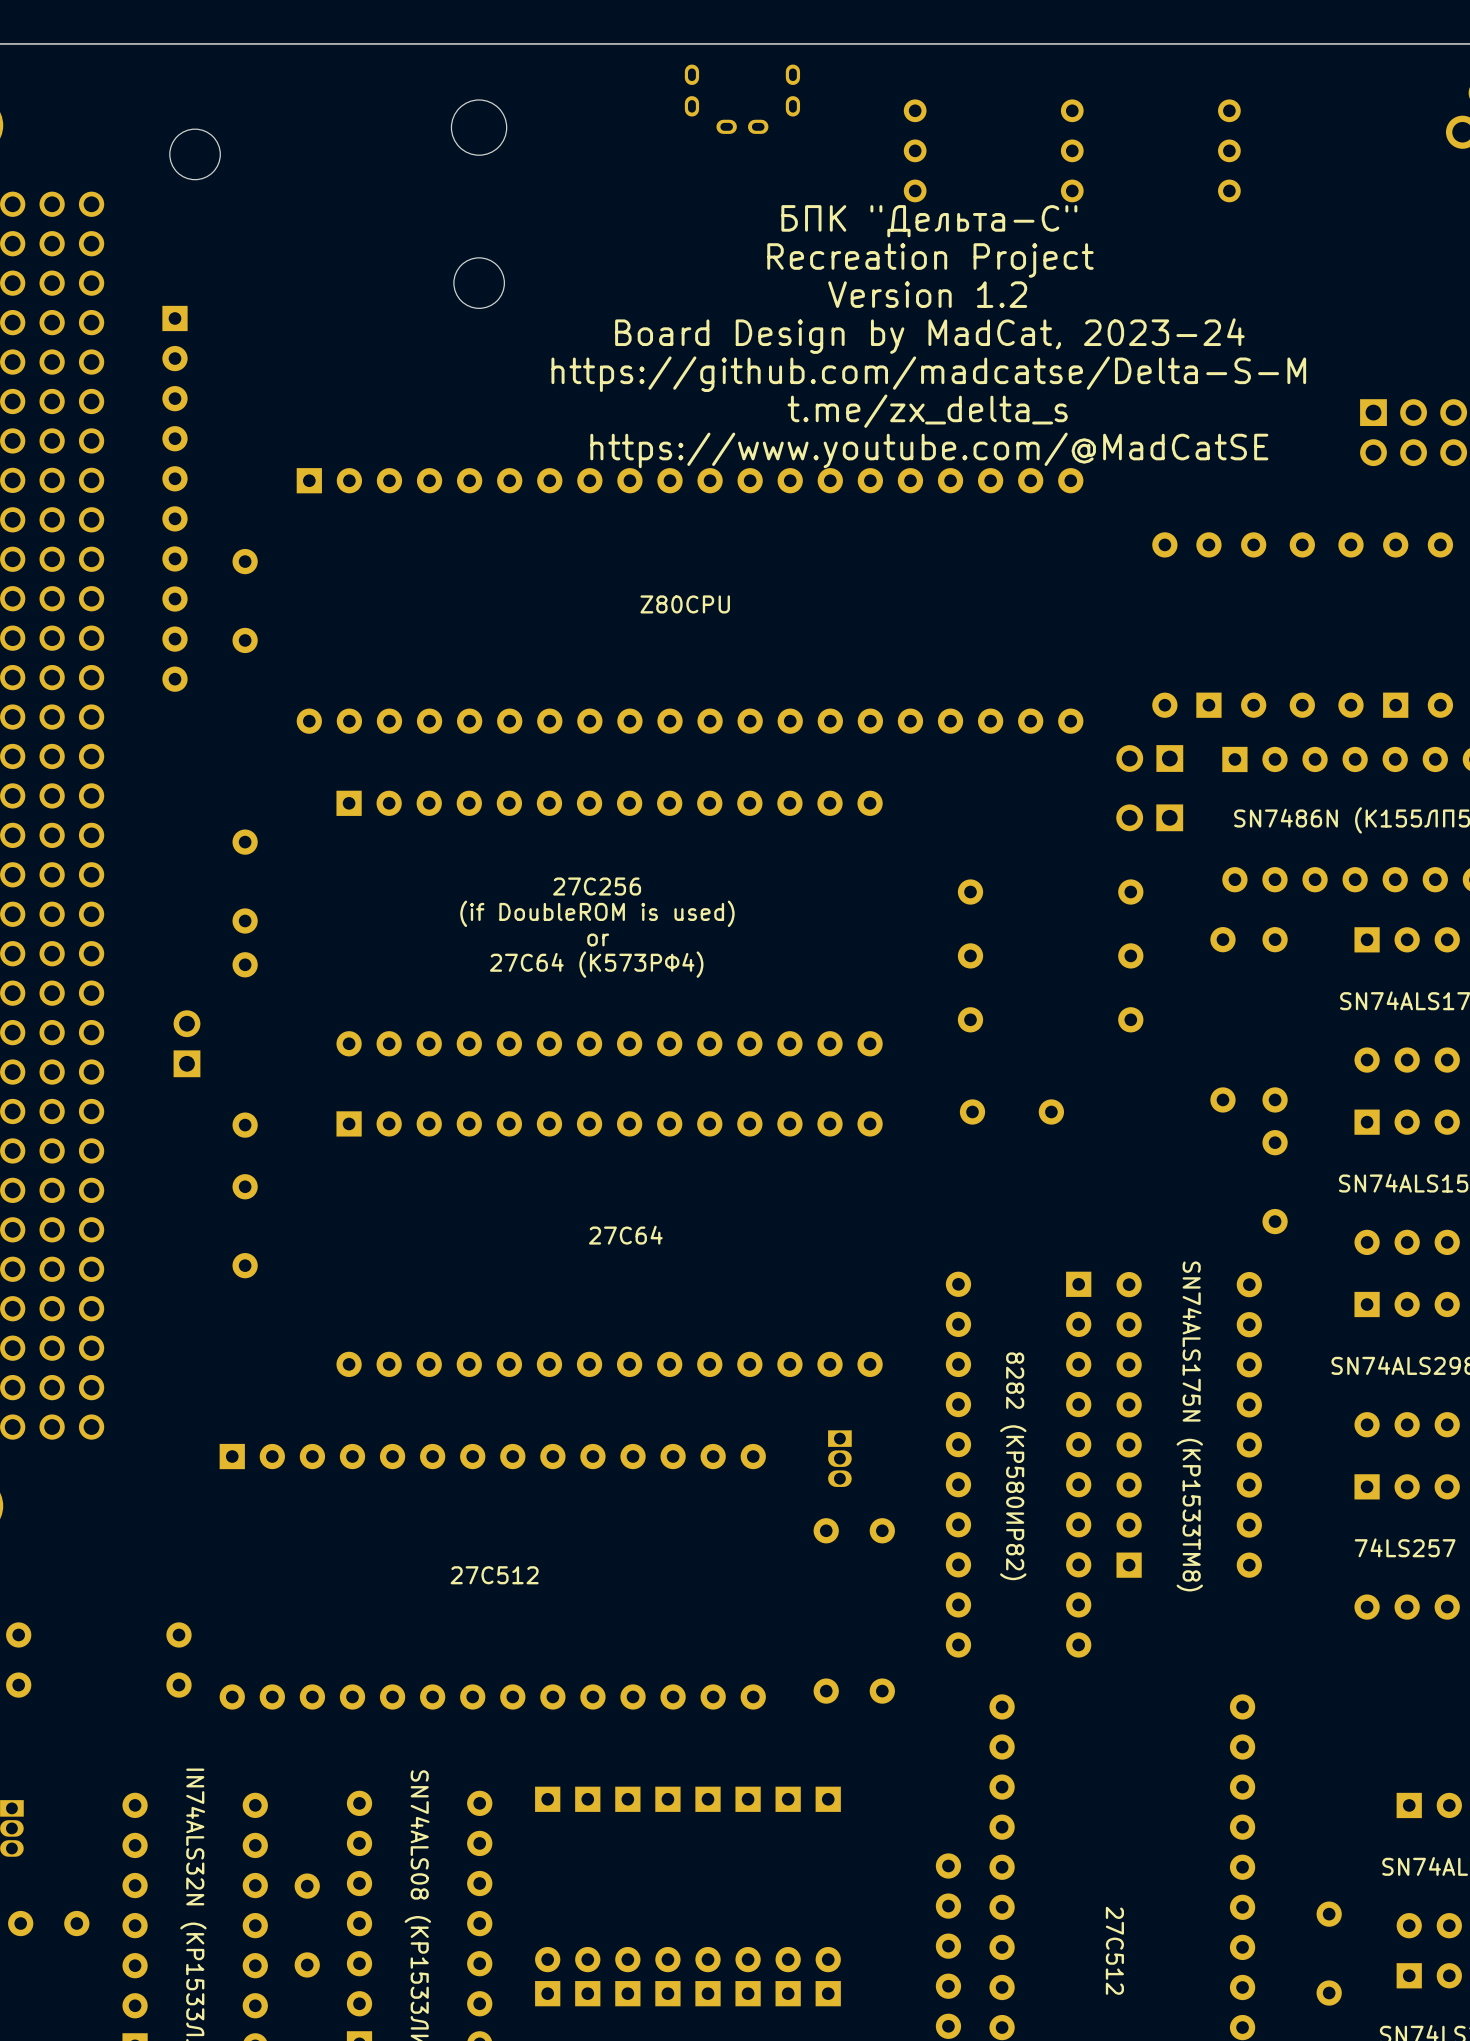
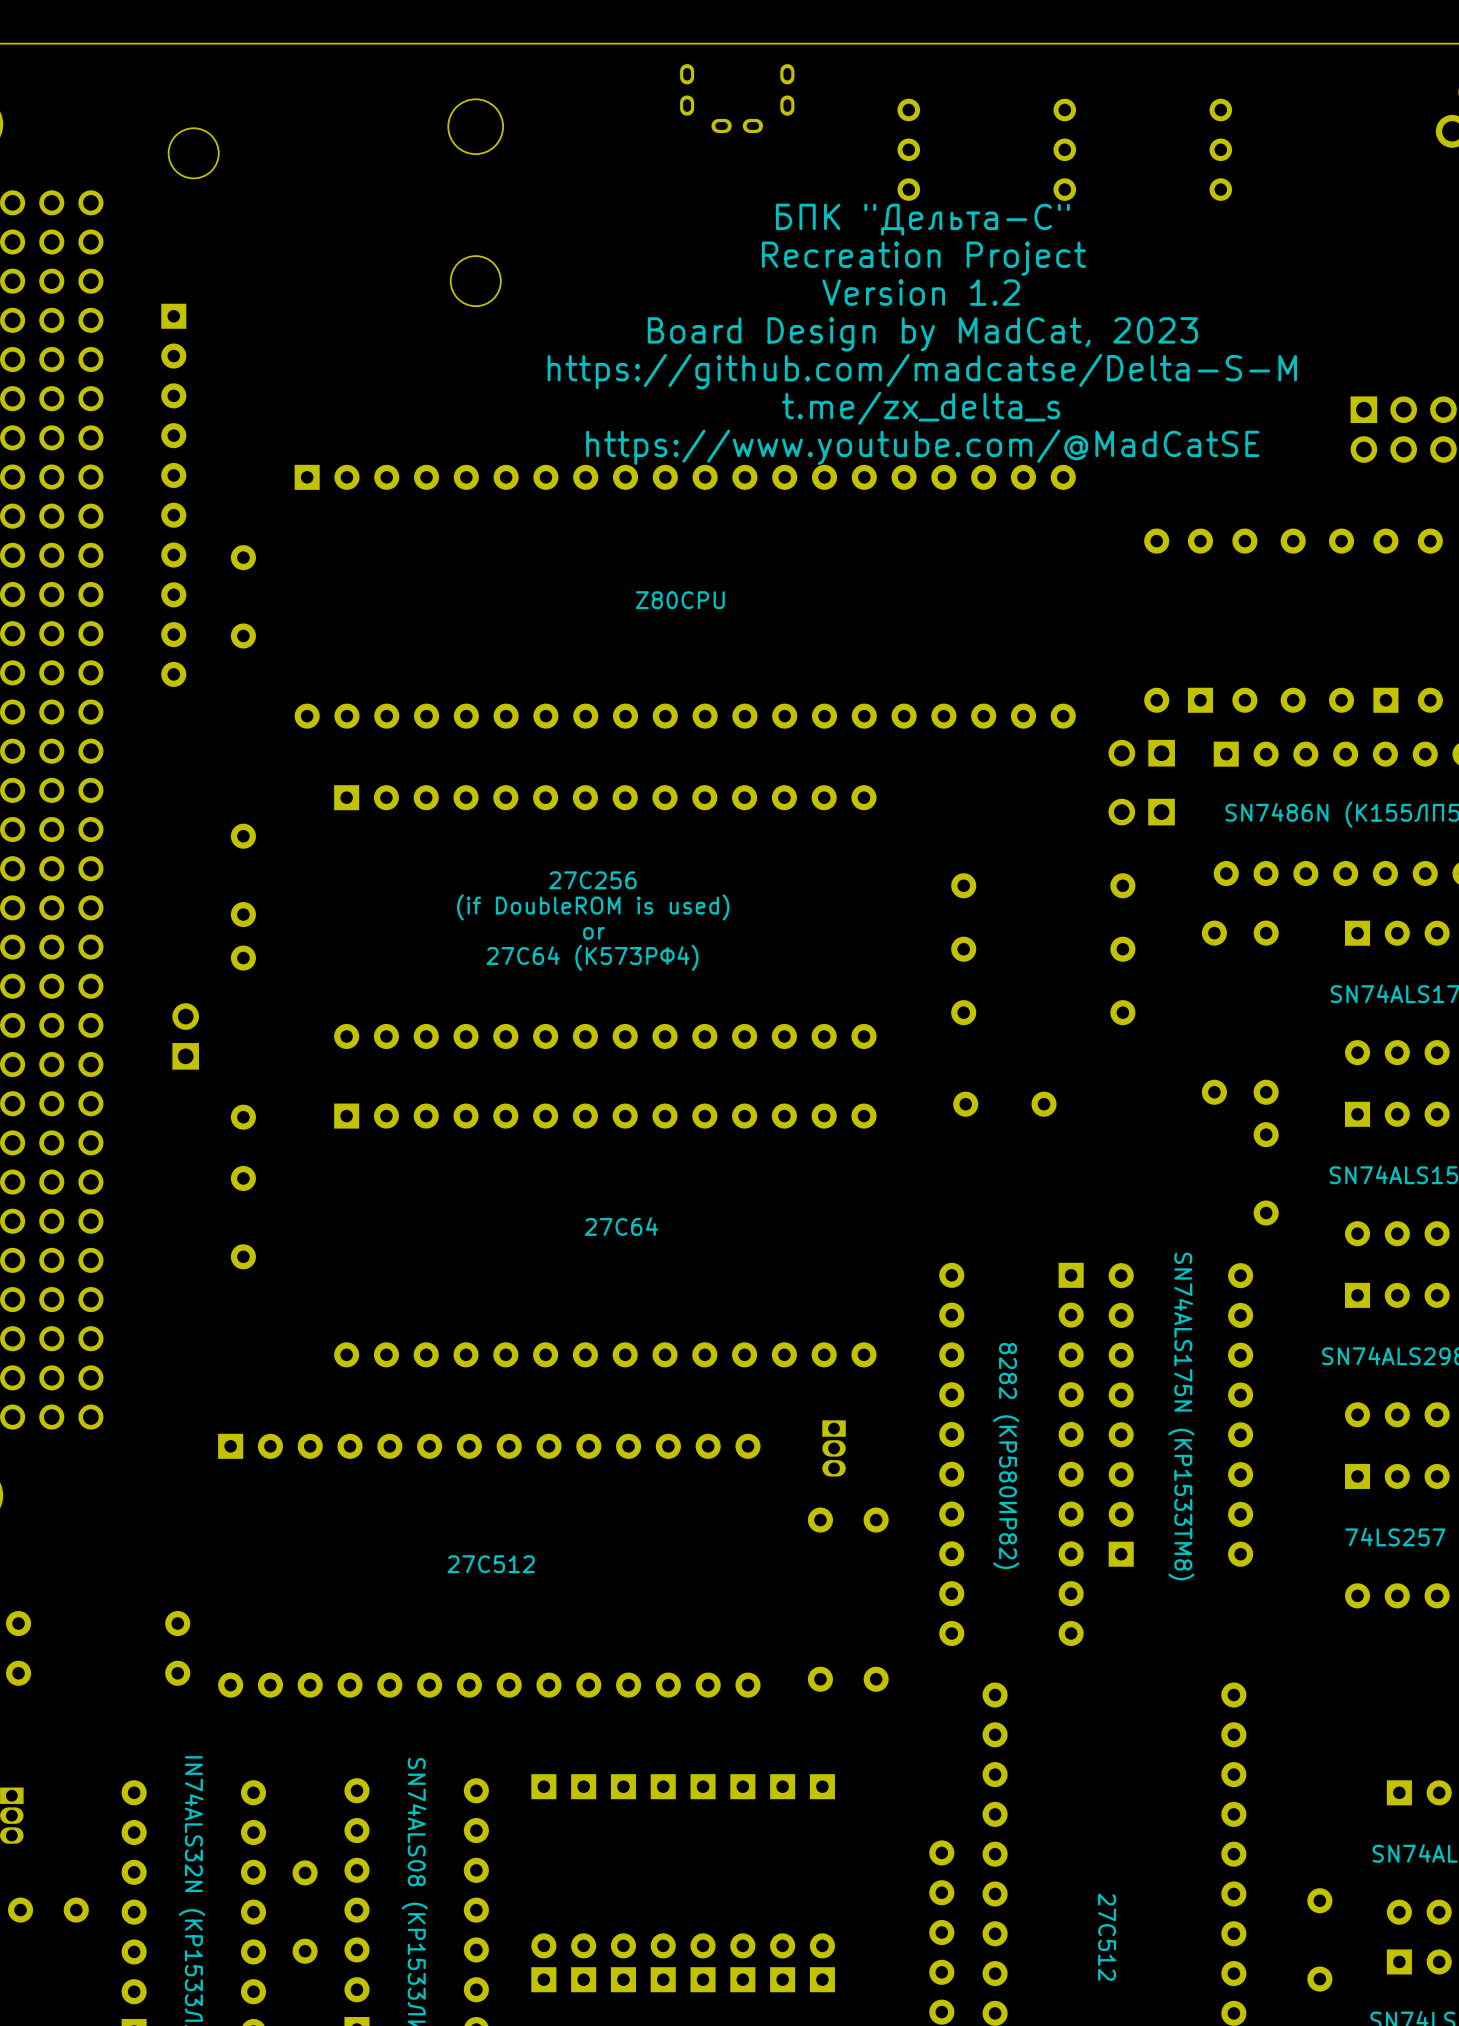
text: Board Design by MadCat, 2023-24 (929, 336) -> Board Design by MadCat, 2023 (922, 334)

